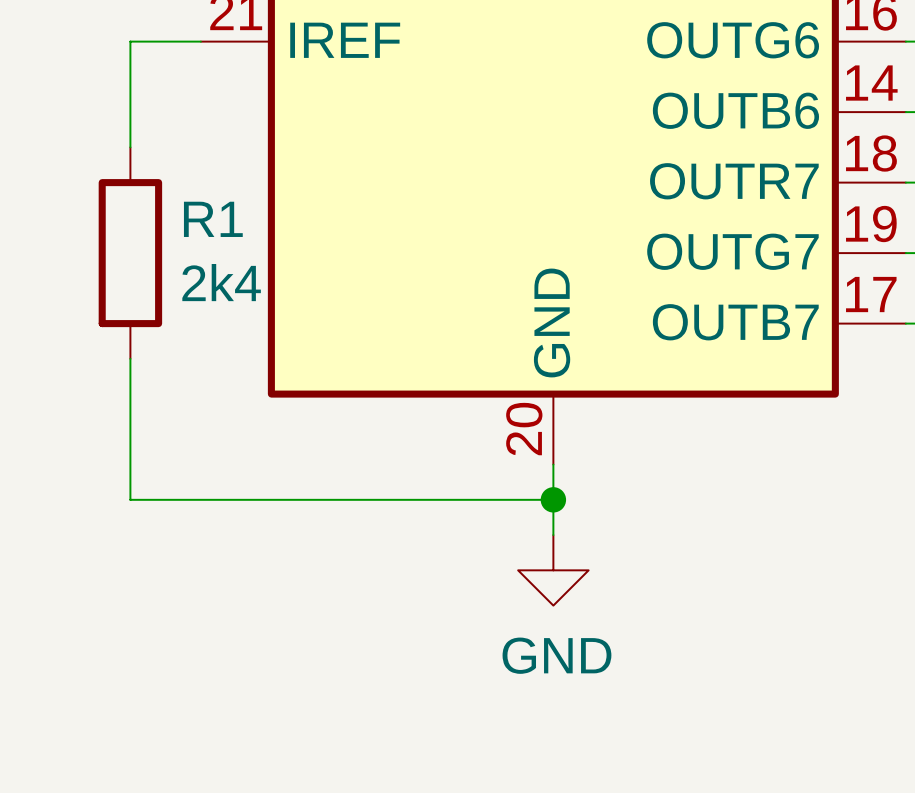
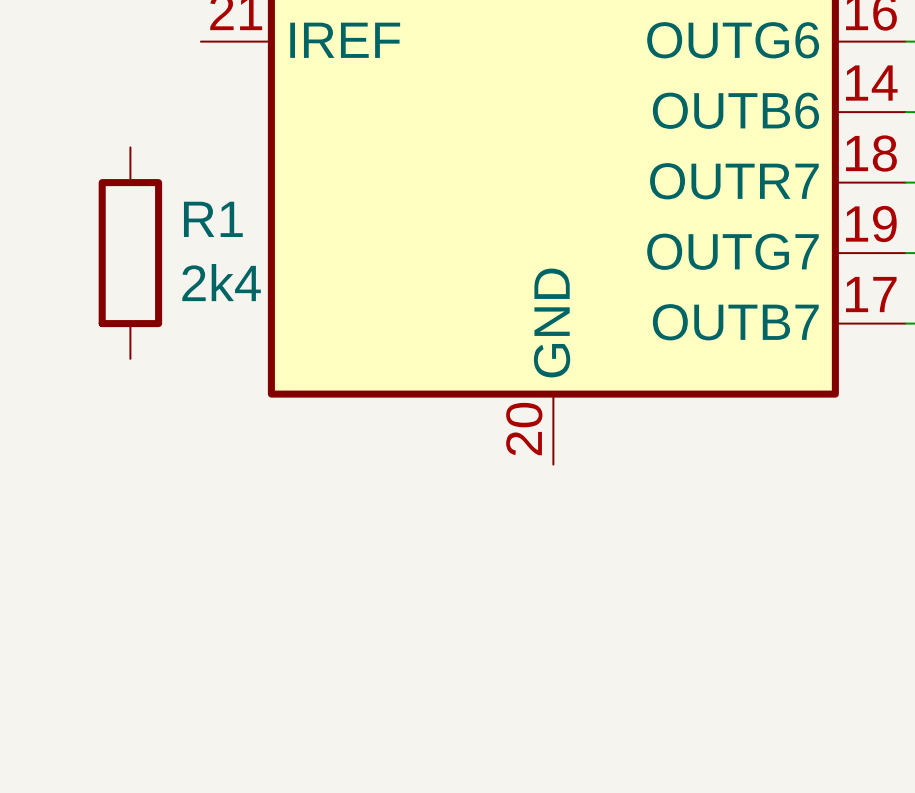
wire: (200, 41) (130, 41) (130, 147) -> none
wire: (130, 358) (130, 499) (553, 499) -> none
wire: (553, 464) (553, 535) -> none
junction: (553, 499) -> none
power symbol: GND (553, 570) -> none

